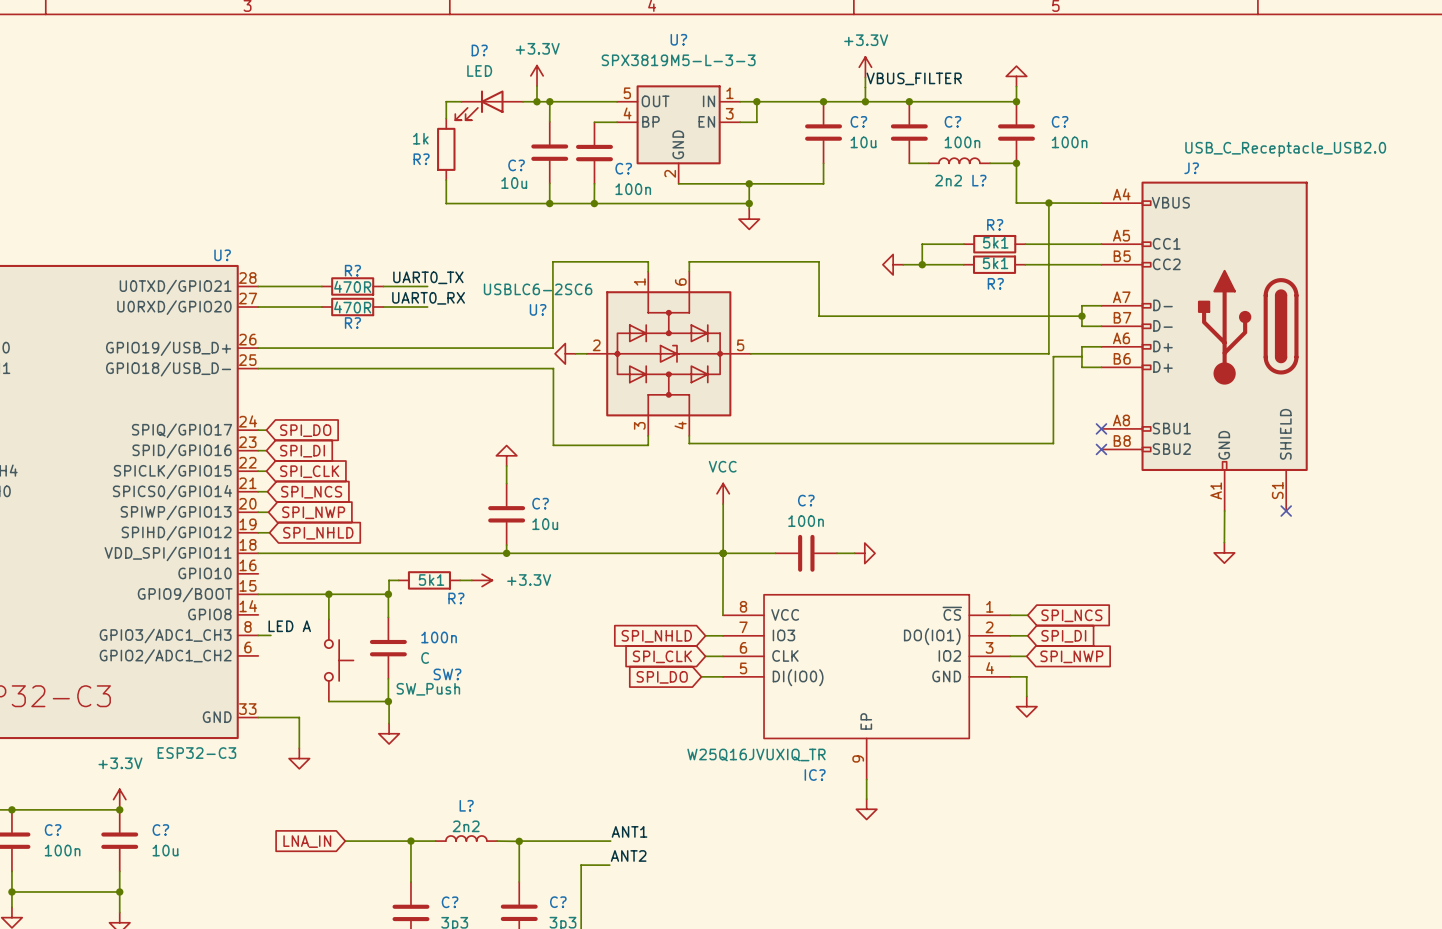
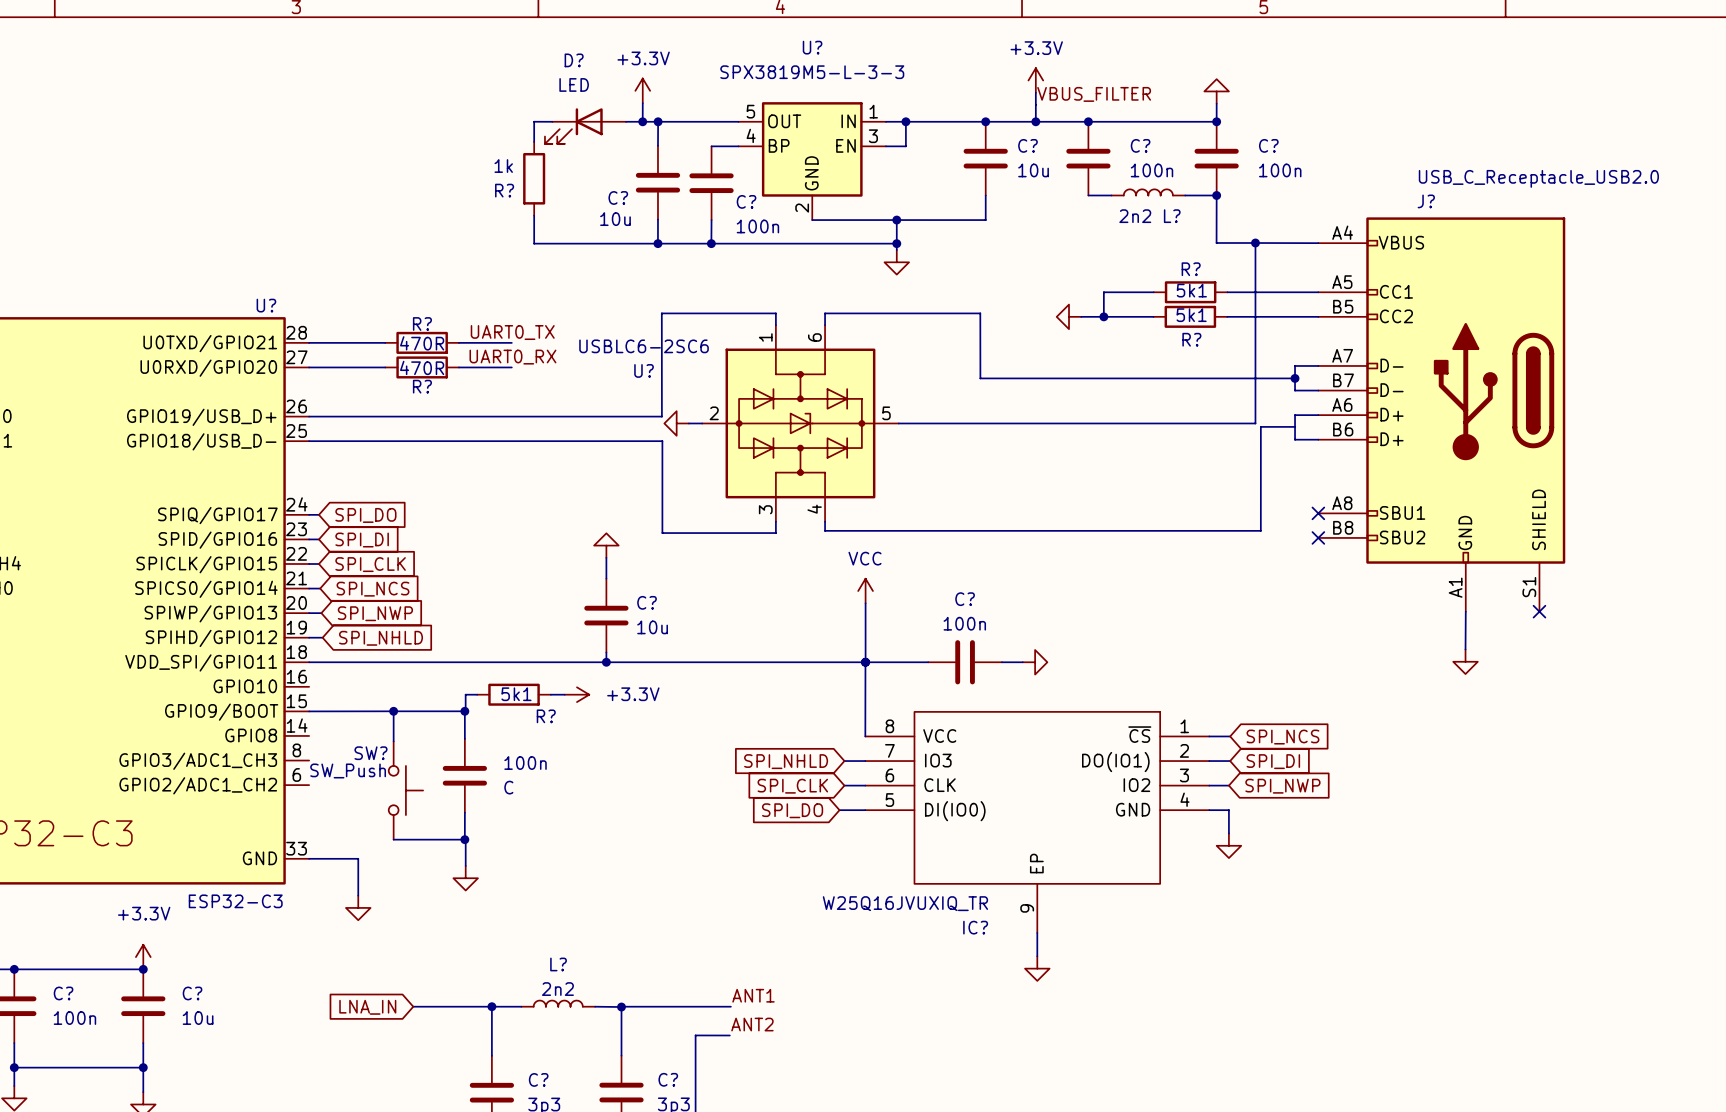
label: LED A (289, 626) -> none
wire: (258, 635) (270, 635) -> none
SW? name position: SW? (447, 674) -> SW? (370, 753)
SW? value position: SW_Push (428, 689) -> SW_Push (348, 770)

